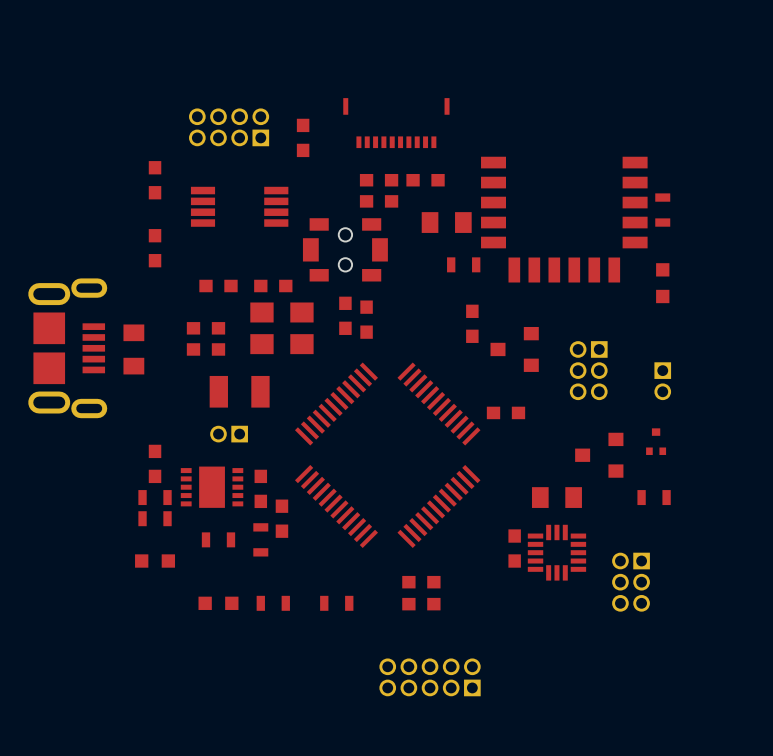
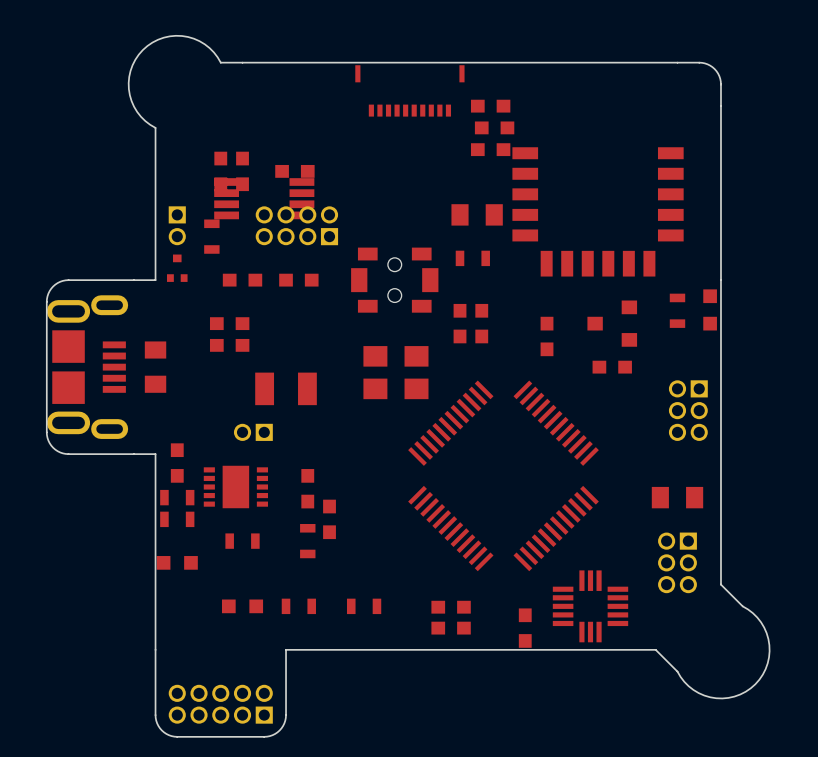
board edge: none -> (699, 62) (220, 62) (213, 52) (199, 41) (188, 36) (175, 35) (158, 39) (147, 45) (138, 54) (130, 70) (128, 89) (131, 101) (137, 111) (145, 121) (155, 127) (155, 280) (65, 280) (57, 283) (51, 288) (46, 301) (46, 432) (51, 445) (62, 453) (155, 454) (155, 715) (157, 723) (164, 732) (177, 736) (264, 736) (277, 732) (283, 725) (285, 717) (286, 649) (655, 649) (677, 671) (688, 686) (698, 693) (710, 697) (722, 698) (734, 696) (745, 691) (759, 679) (765, 669) (769, 657) (769, 645) (766, 633) (757, 617) (742, 606) (720, 584) (720, 84) (719, 76) (714, 69) (707, 64) (699, 62)
part: none -> (490, 106)
part position: (396, 123) -> (409, 90)
part position: (229, 127) -> (296, 225)
part: (303, 137) -> none
part: none -> (494, 127)
part: none -> (490, 149)
part: (155, 180) -> none
part: none -> (220, 171)
part: none -> (242, 171)
part: none -> (294, 171)
part: (379, 180) -> none
part: (425, 180) -> none
part: (379, 201) -> none
part: (662, 210) -> none
part: none -> (177, 225)
part: none -> (211, 236)
part: (155, 248) -> none
part position: (345, 249) -> (394, 280)
part position: (463, 264) -> (472, 258)
part: none -> (177, 268)
part position: (662, 283) -> (710, 309)
part: (345, 315) -> none
part: none -> (677, 310)
part: (366, 319) -> none
part: (472, 323) -> none
part footprint: [490, 326, 539, 372] -> [540, 316, 554, 357]
part position: (281, 328) -> (395, 372)
part: none -> (460, 323)
part: none -> (481, 323)
part footprint: [569, 341, 608, 401] -> [592, 360, 632, 374]
part position: (67, 348) -> (87, 367)
part position: (133, 349) -> (155, 367)
part: (662, 381) -> none
part position: (239, 391) -> (286, 388)
part: (506, 412) -> none
part: none -> (688, 410)
part: (656, 441) -> none
part position: (387, 455) -> (503, 475)
part position: (599, 455) -> (612, 323)
part: (260, 488) -> none
part: none -> (307, 488)
part footprint: [637, 490, 671, 506] -> [651, 486, 704, 509]
part: (556, 497) -> none
part: (281, 518) -> none
part: none -> (329, 519)
part position: (260, 539) -> (307, 541)
part: (514, 548) -> none
part: (556, 552) -> none
part: (421, 582) -> none
part position: (631, 582) -> (677, 562)
part: none -> (590, 606)
part: none -> (451, 628)
part: none -> (525, 628)
part position: (430, 677) -> (220, 704)

